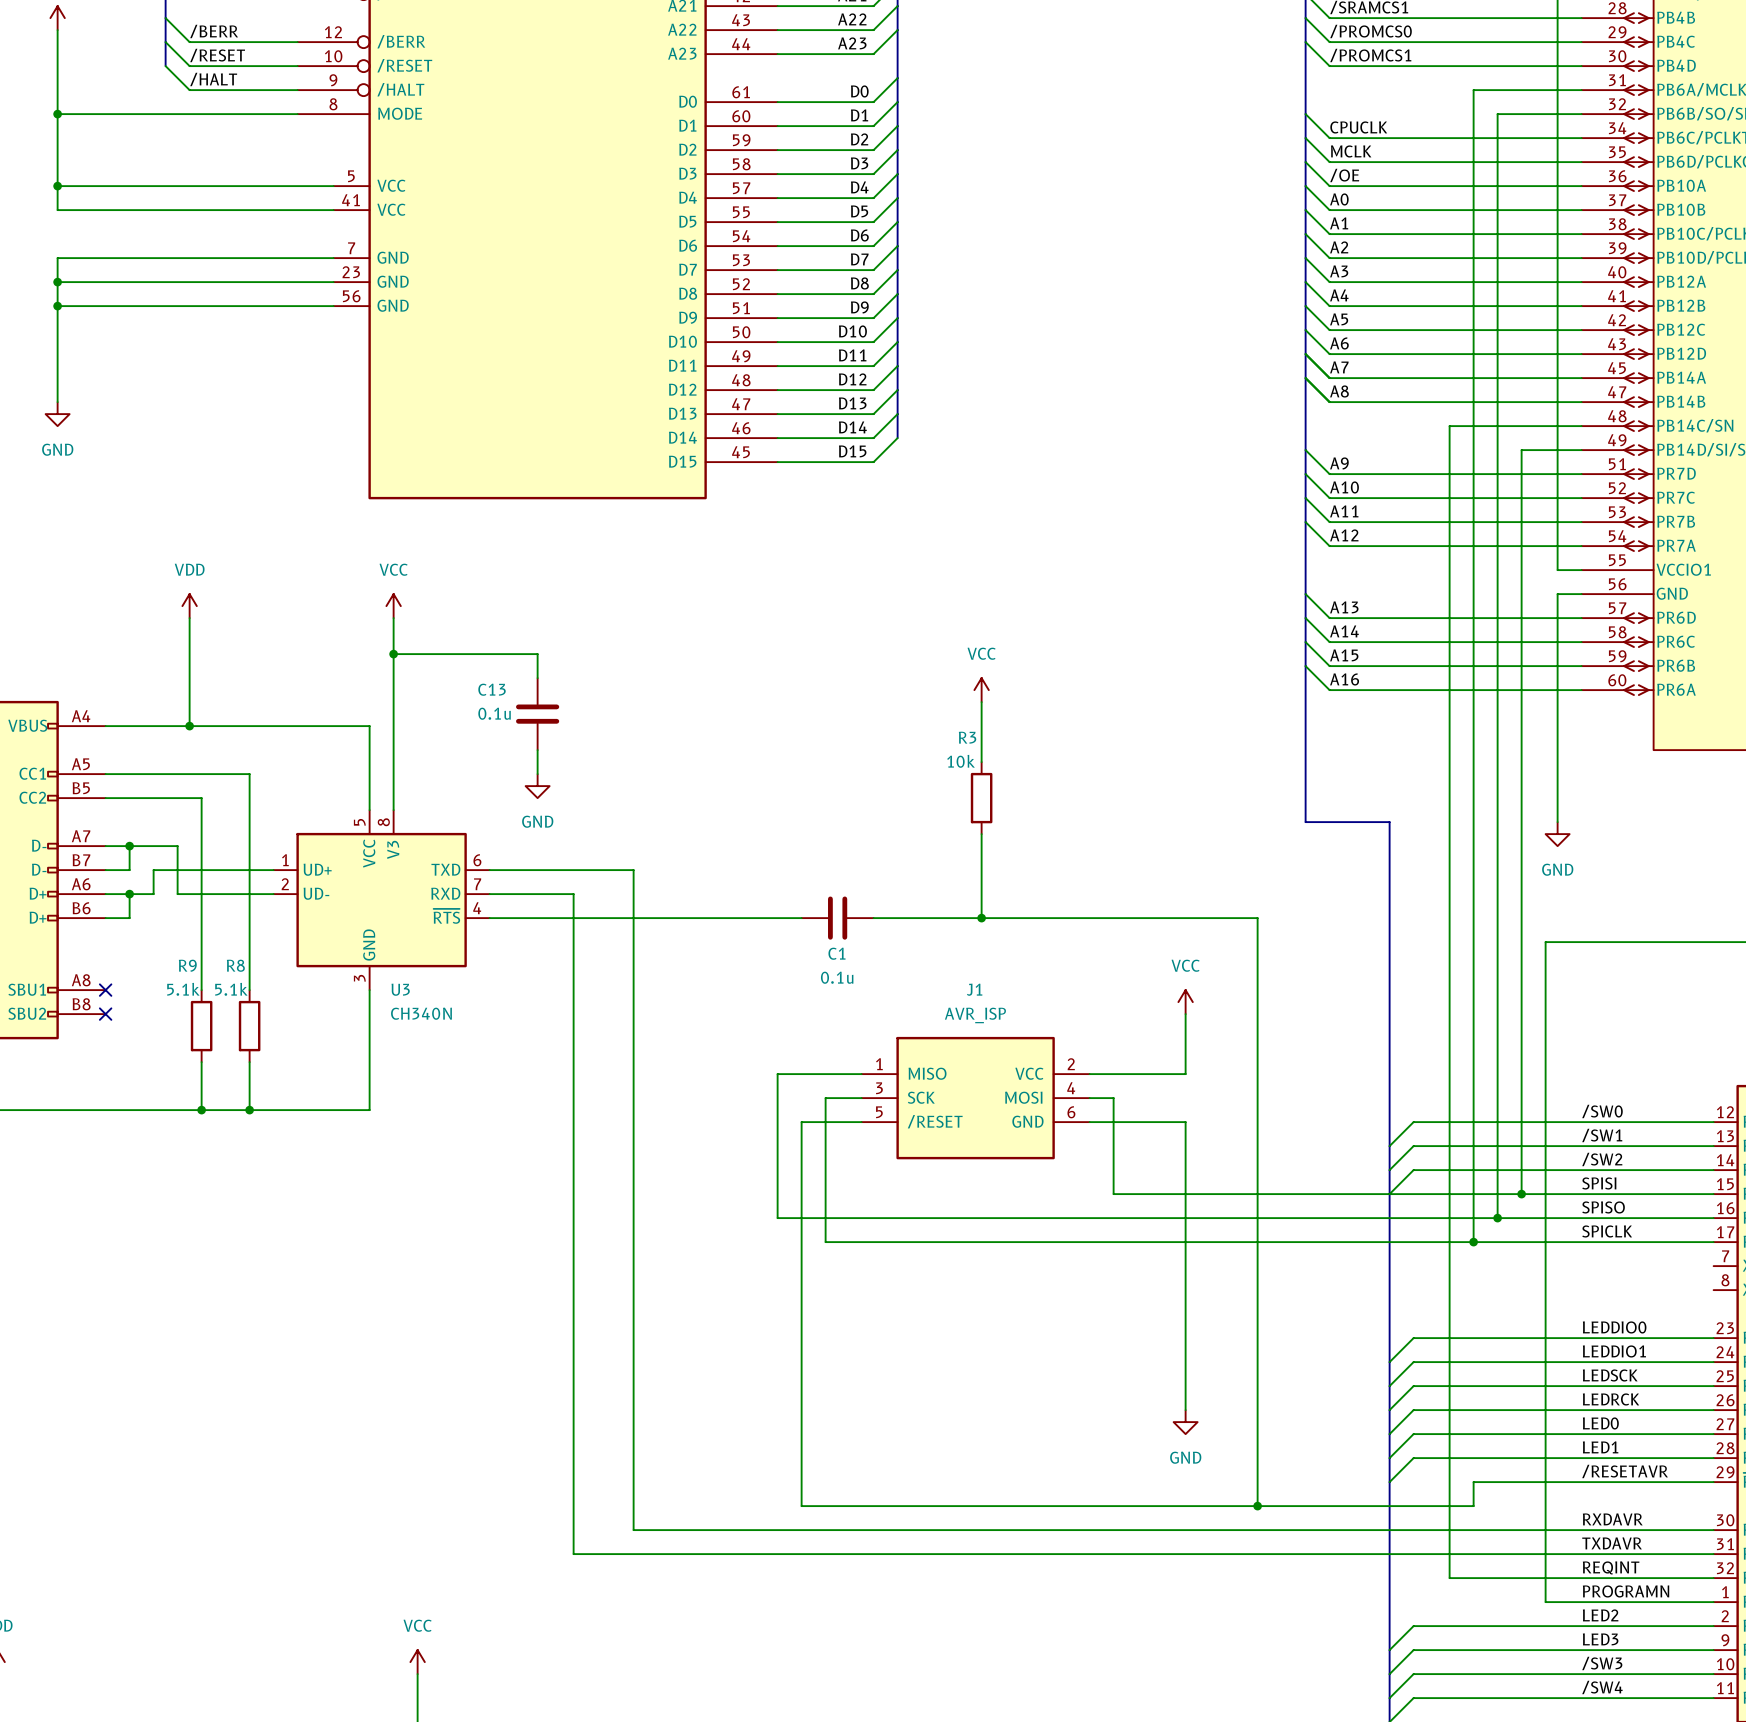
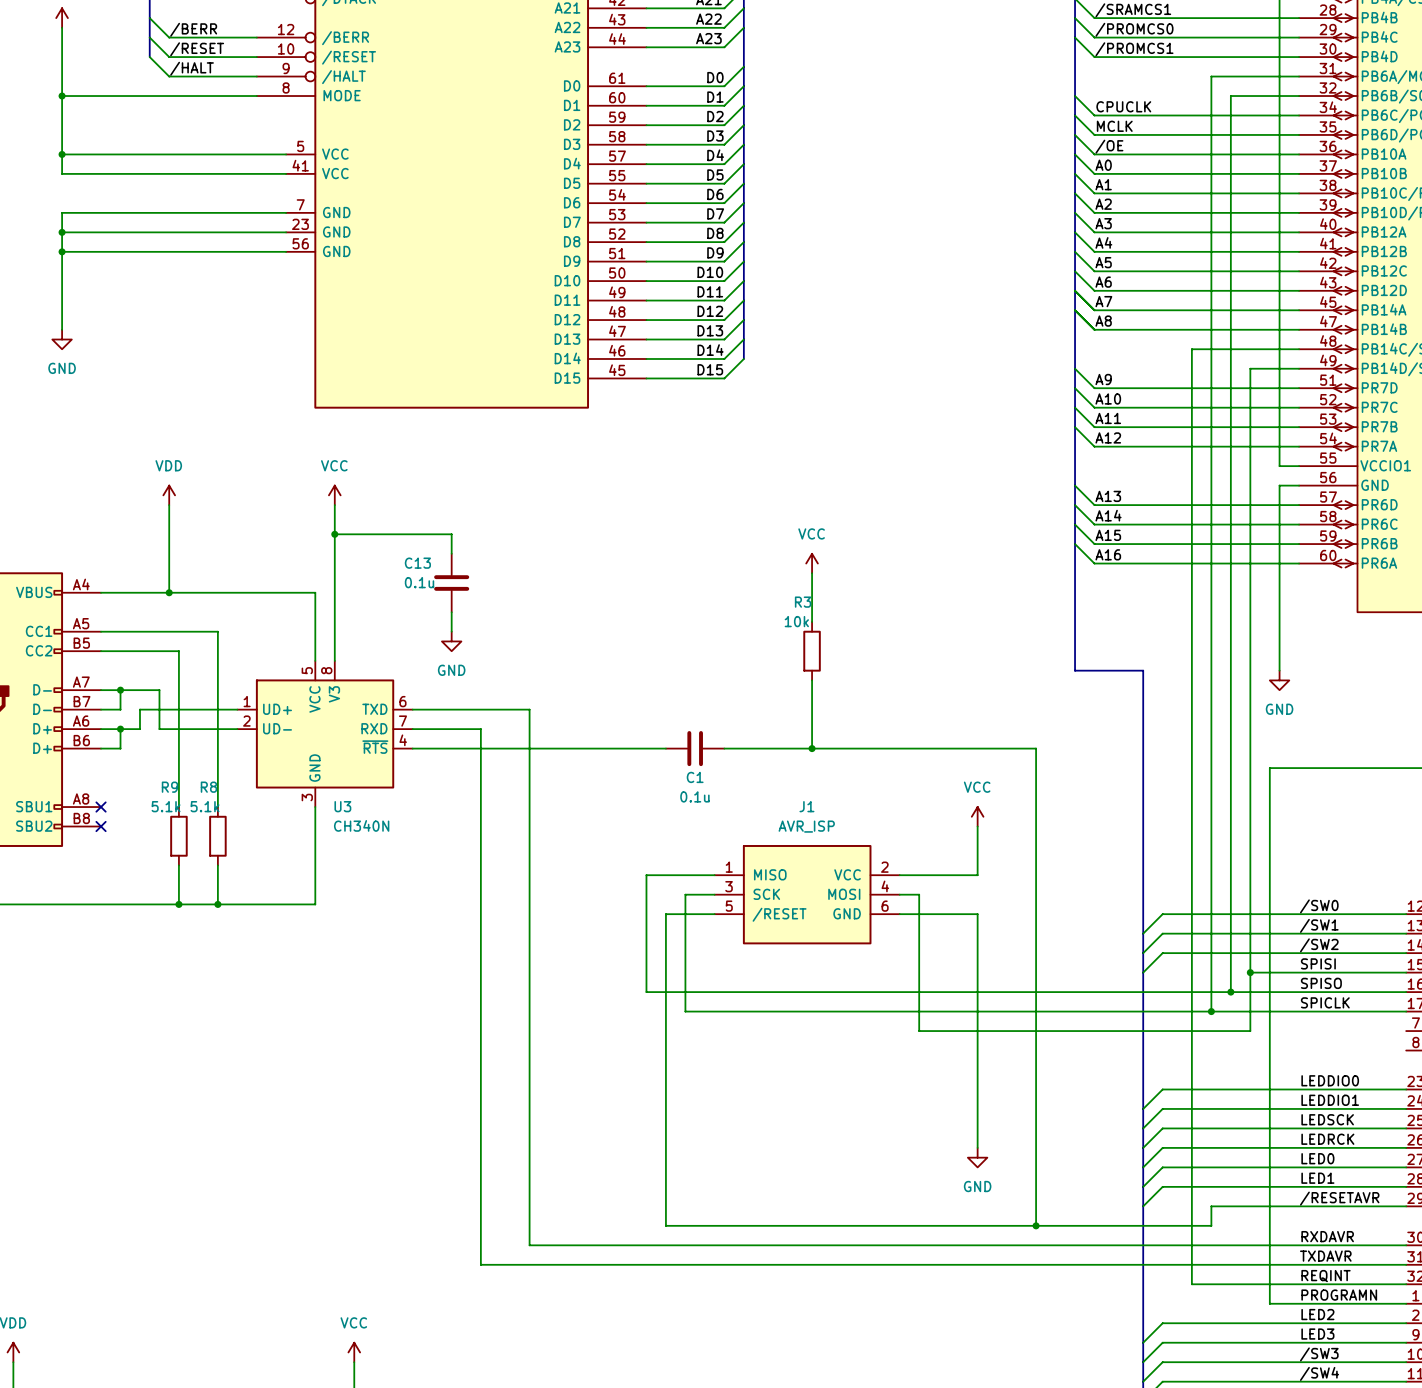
wire: (1113, 1194) (1521, 1194) -> (919, 972) (919, 1031) (1250, 1031) (1250, 972)

